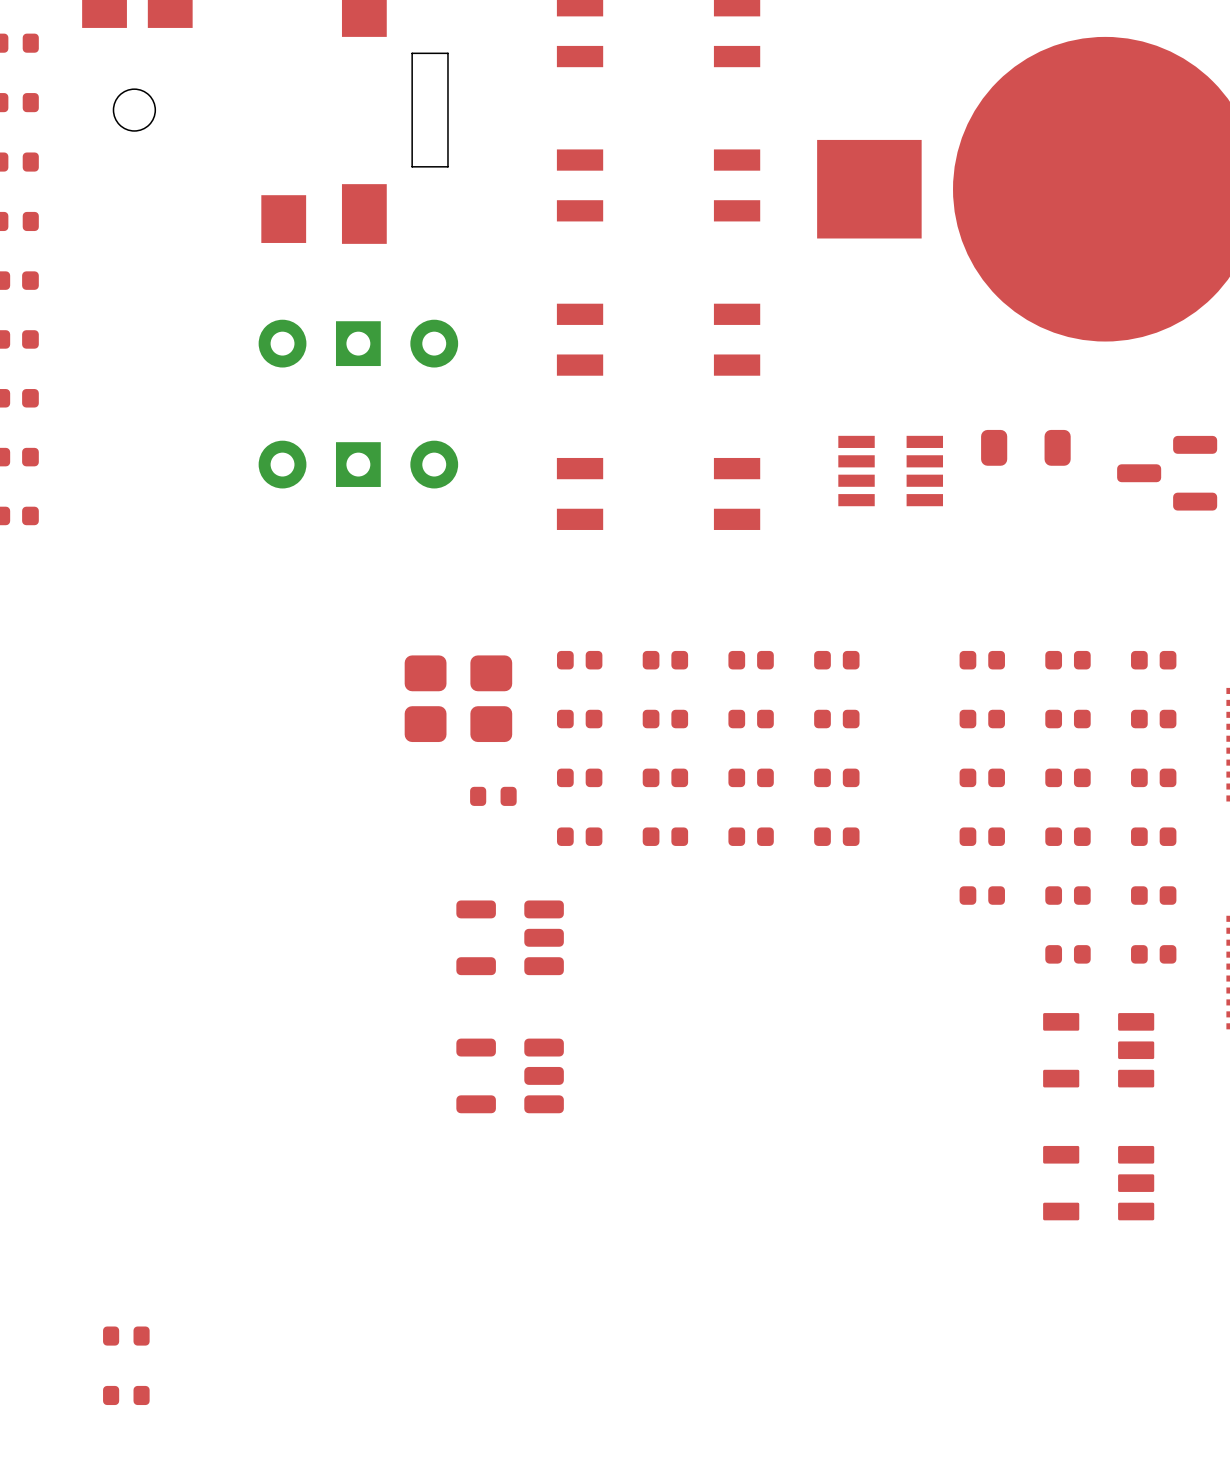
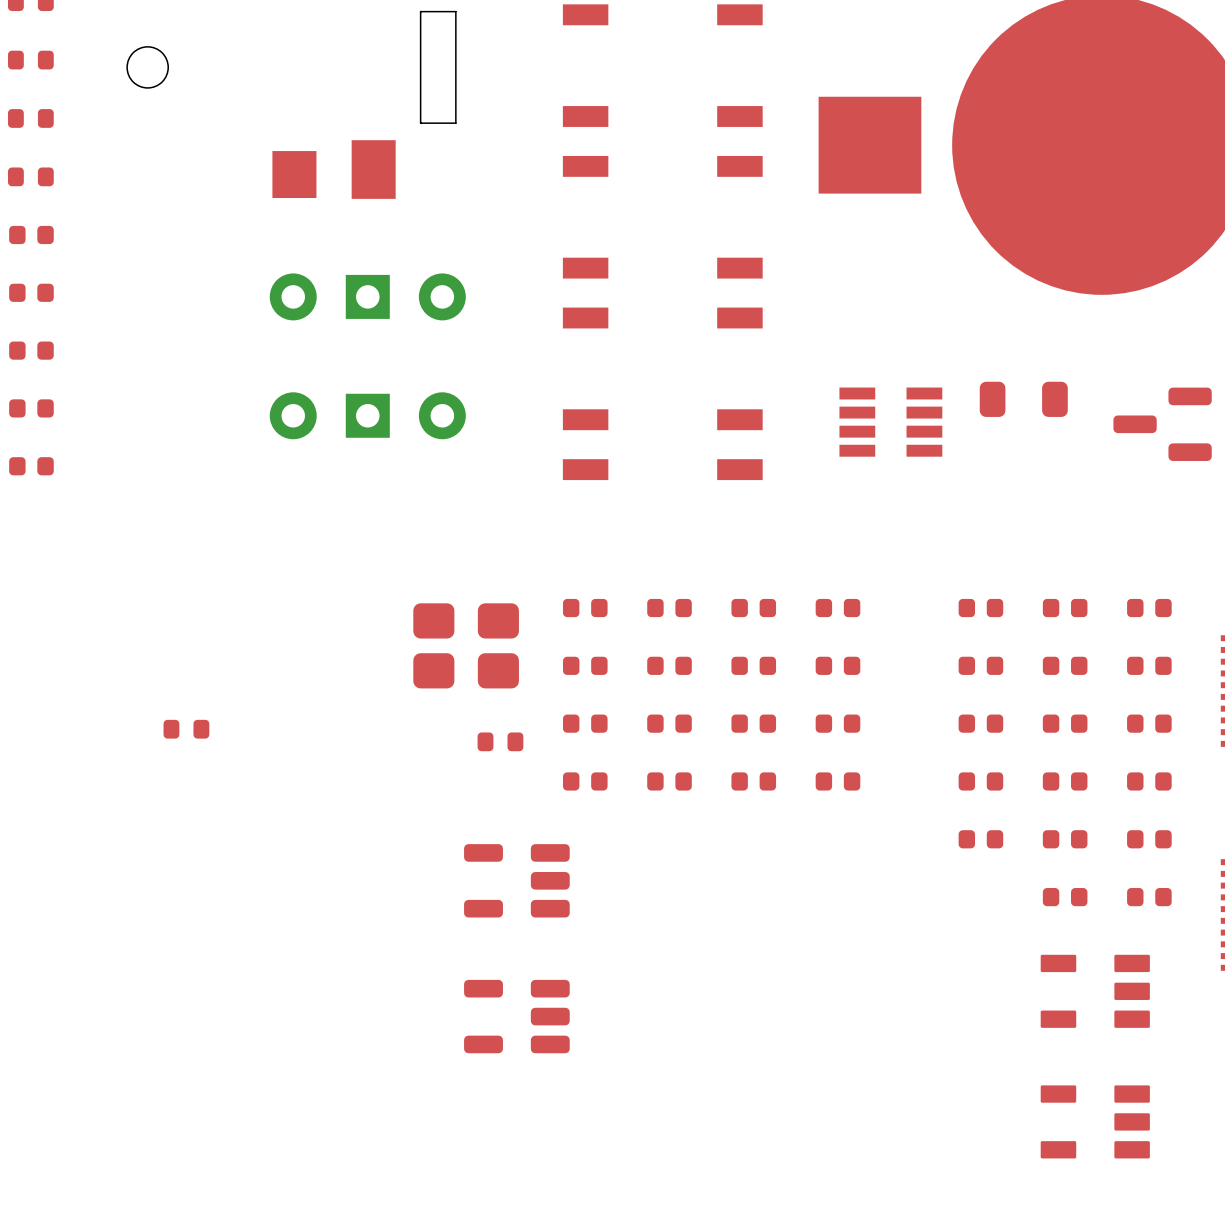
part: none -> (186, 729)

